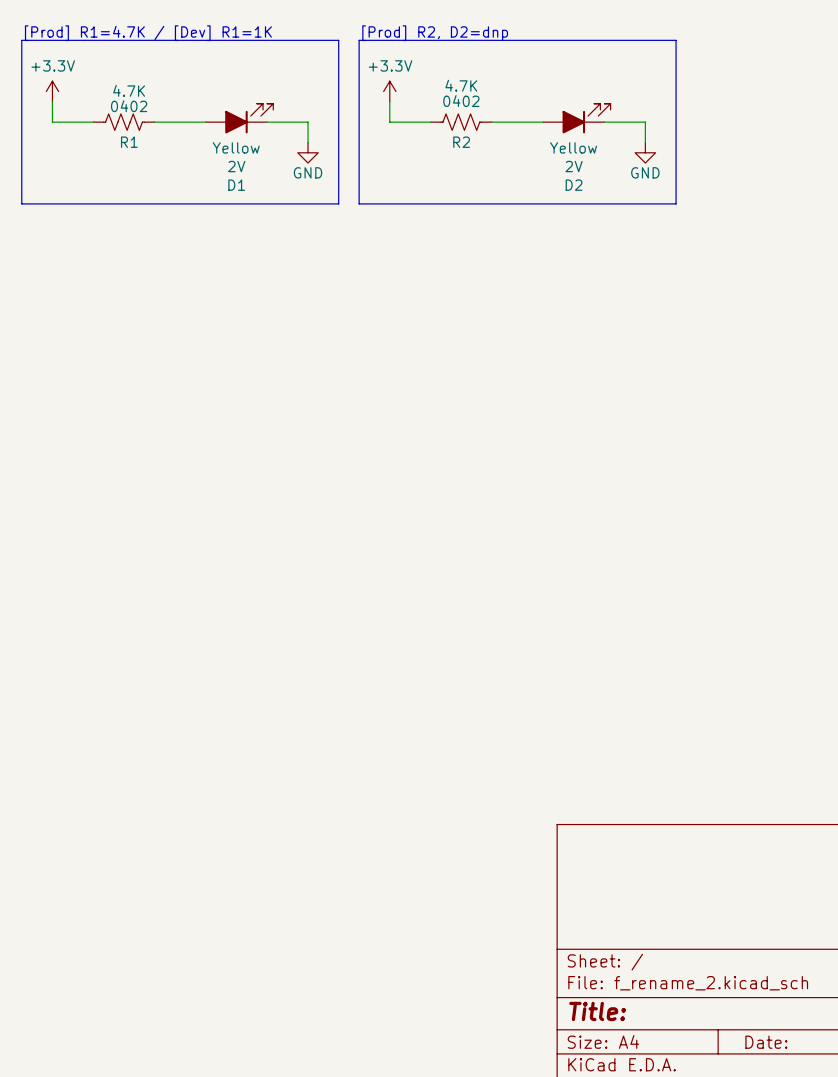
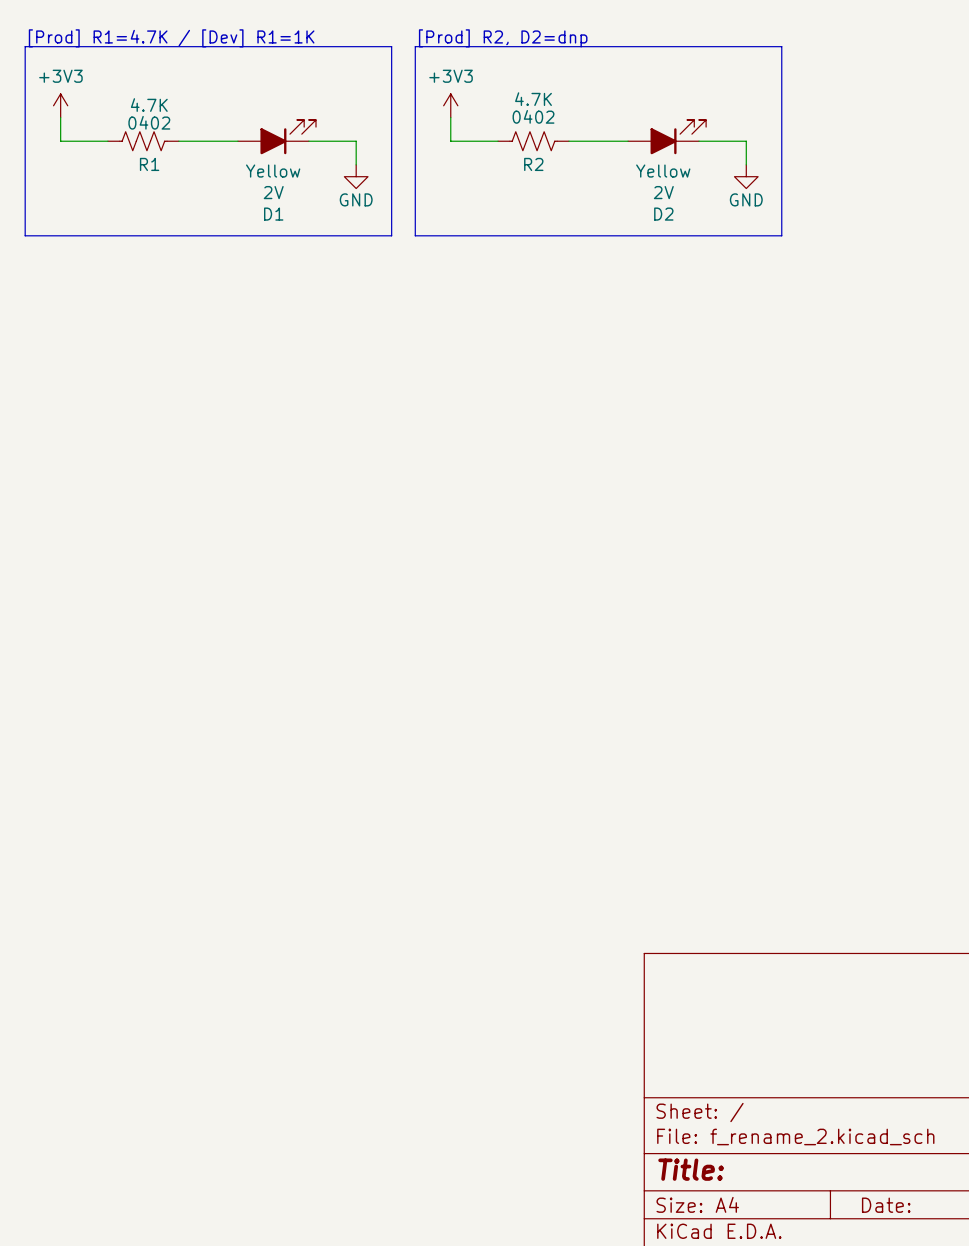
power symbol: +3.3V (52, 91) -> +3V3 (60, 105)
power symbol: +3.3V (389, 91) -> +3V3 (450, 105)

